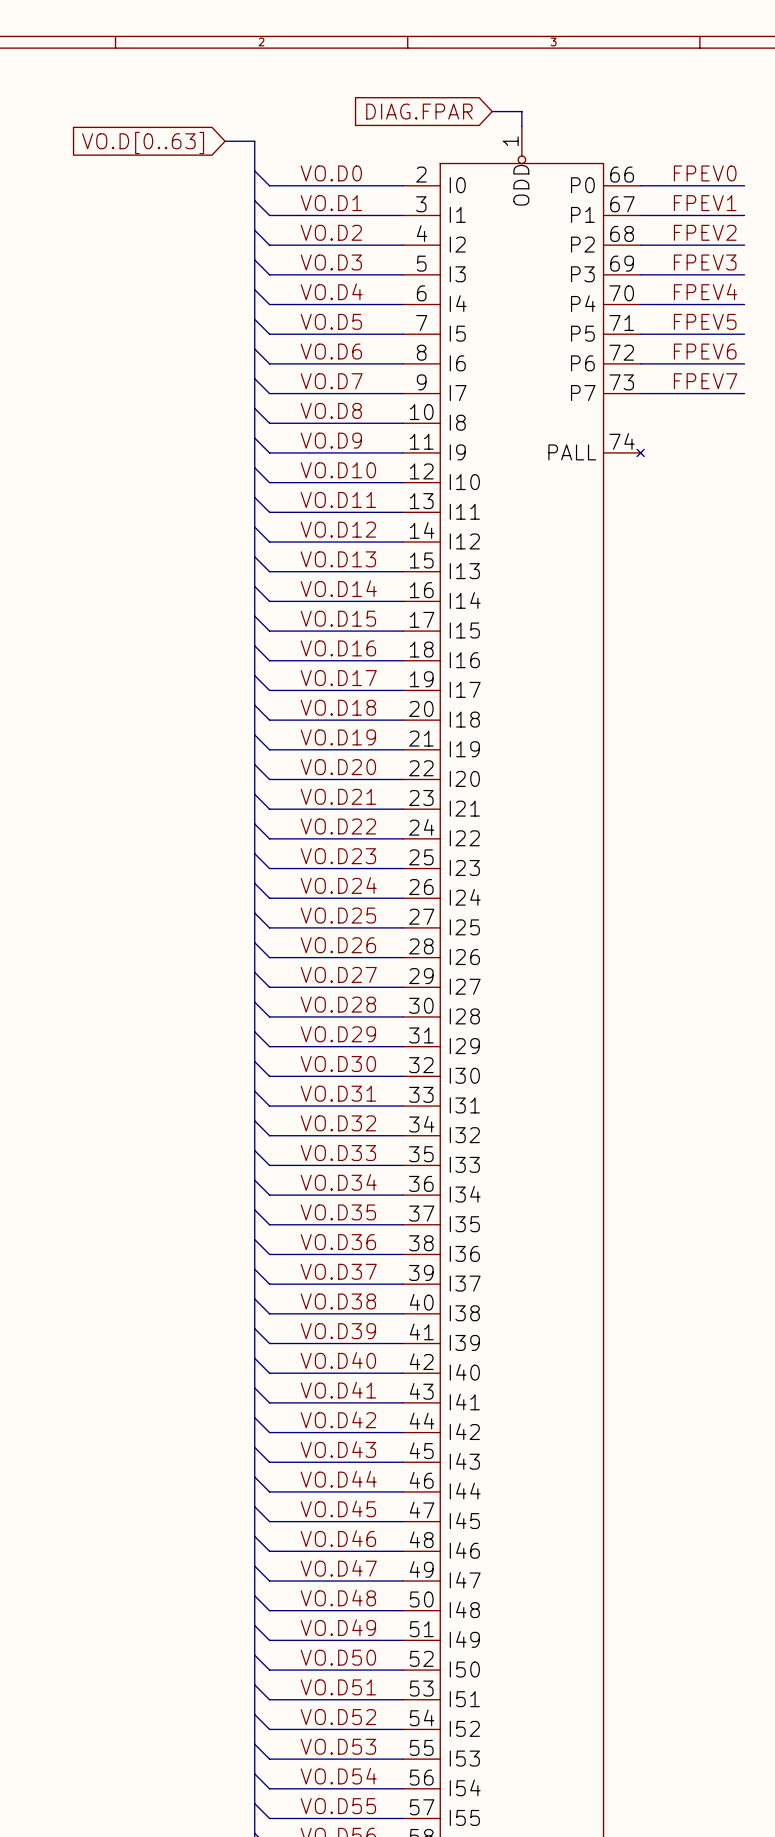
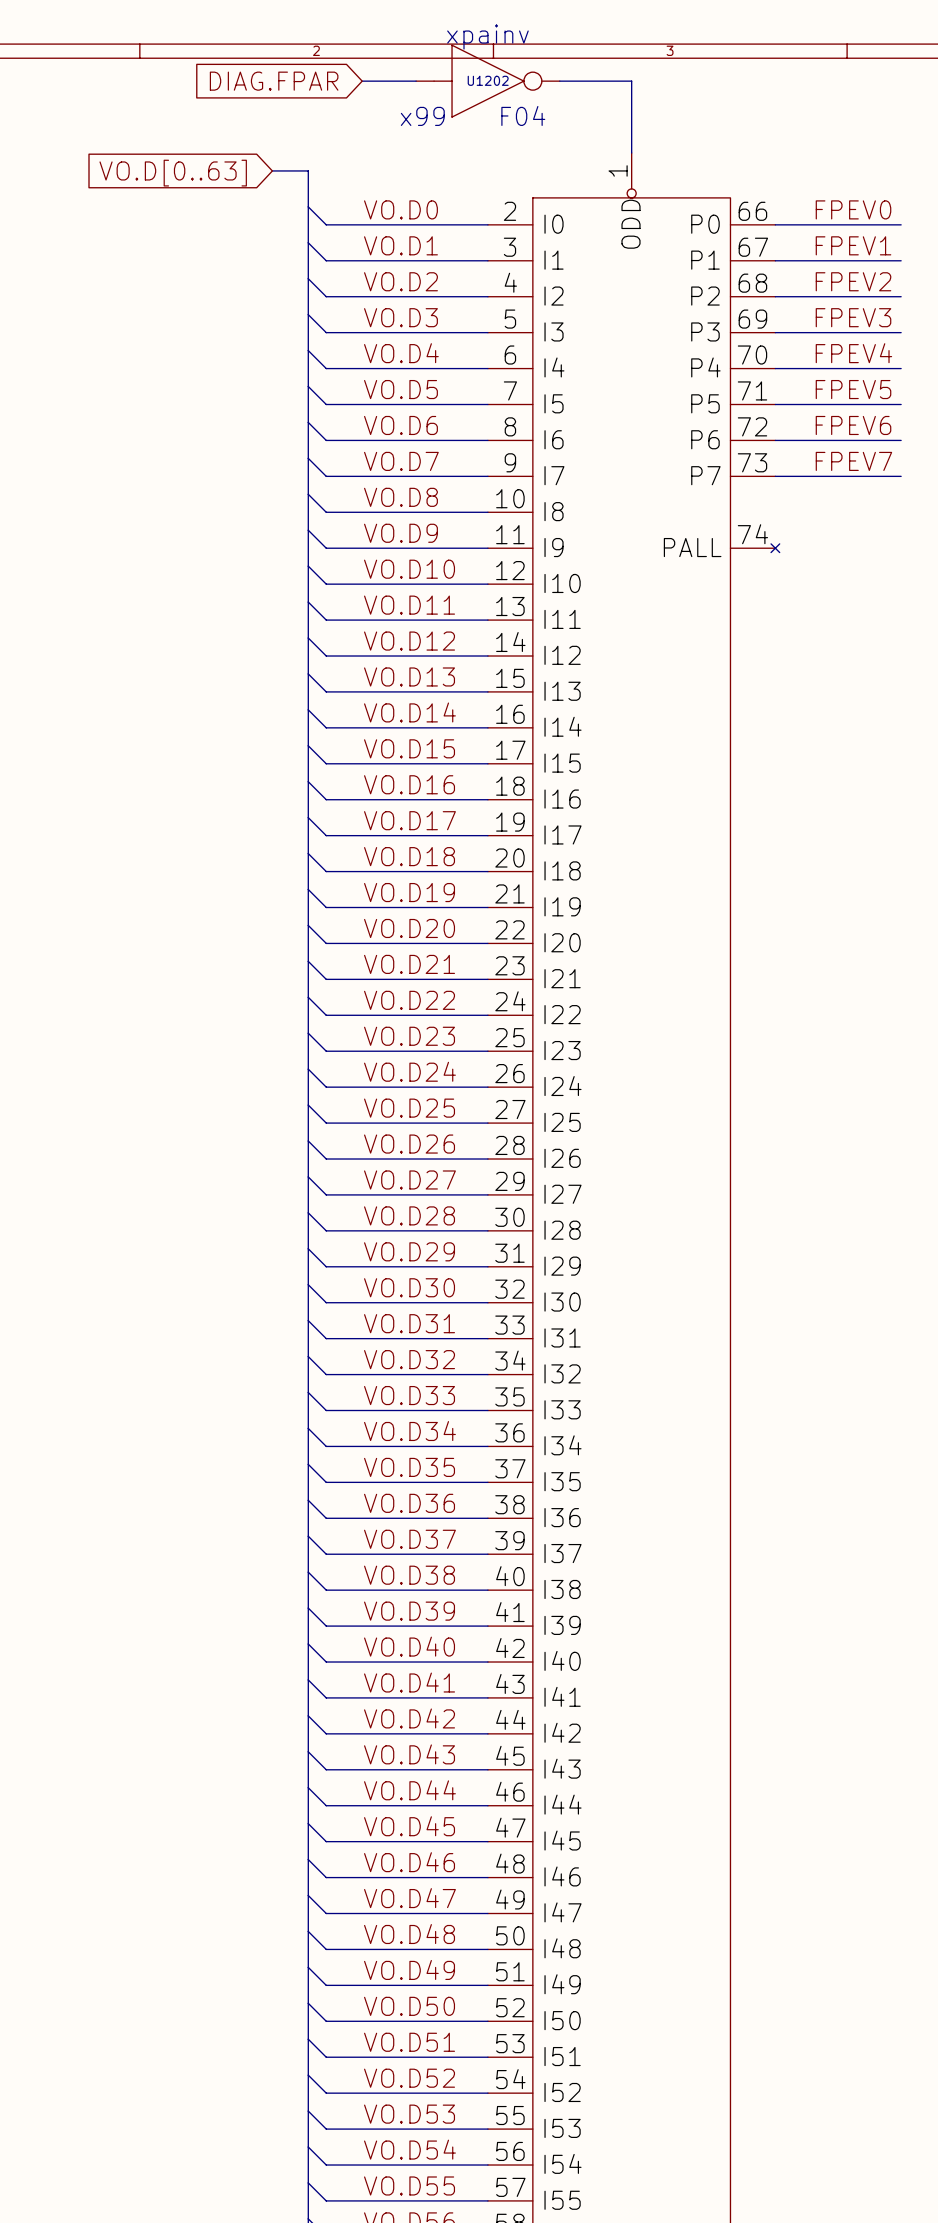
global label: none -> DIAG.FPAR (274, 81)
wire: none -> (362, 81) (416, 81)
U1202: none -> F04 (487, 81)
global label: DIAG.FPAR (419, 111) -> none
wire: (492, 111) (521, 111) -> (559, 81) (631, 81) (631, 135)

